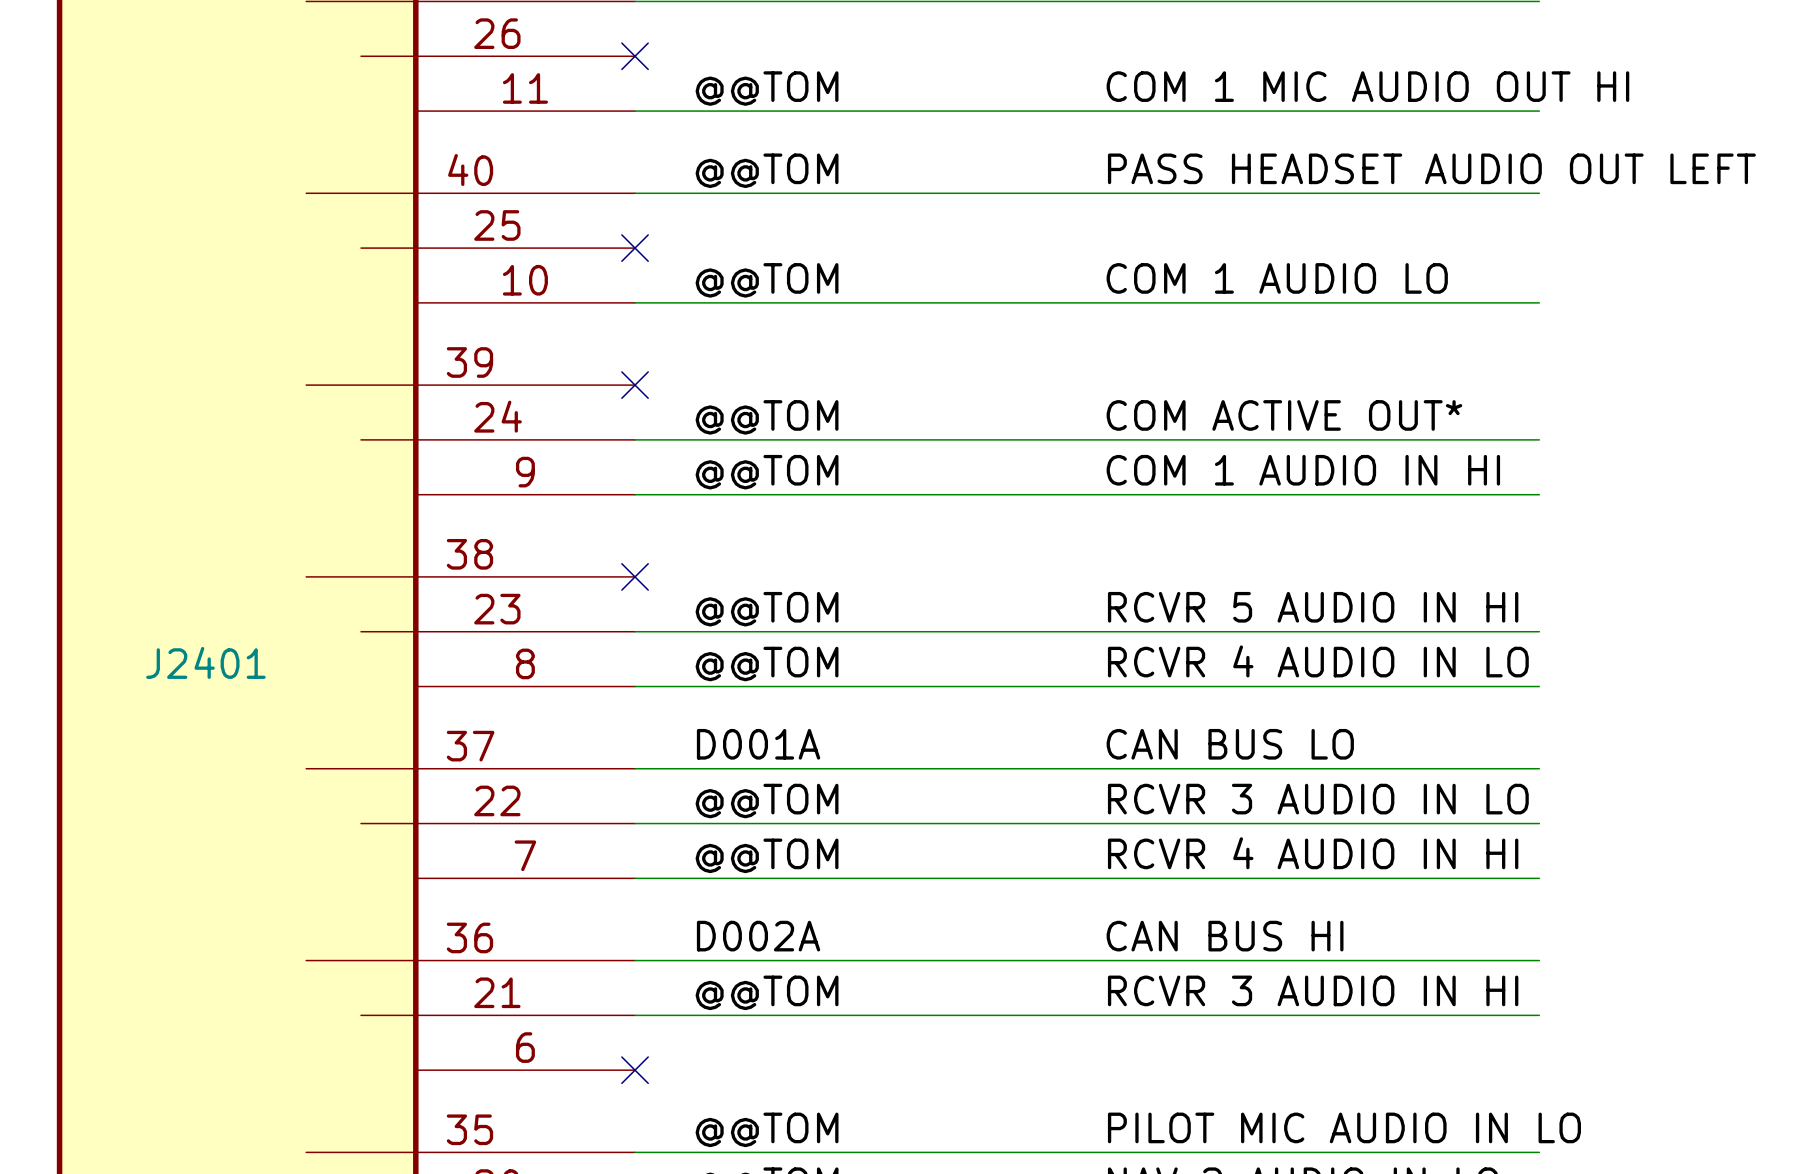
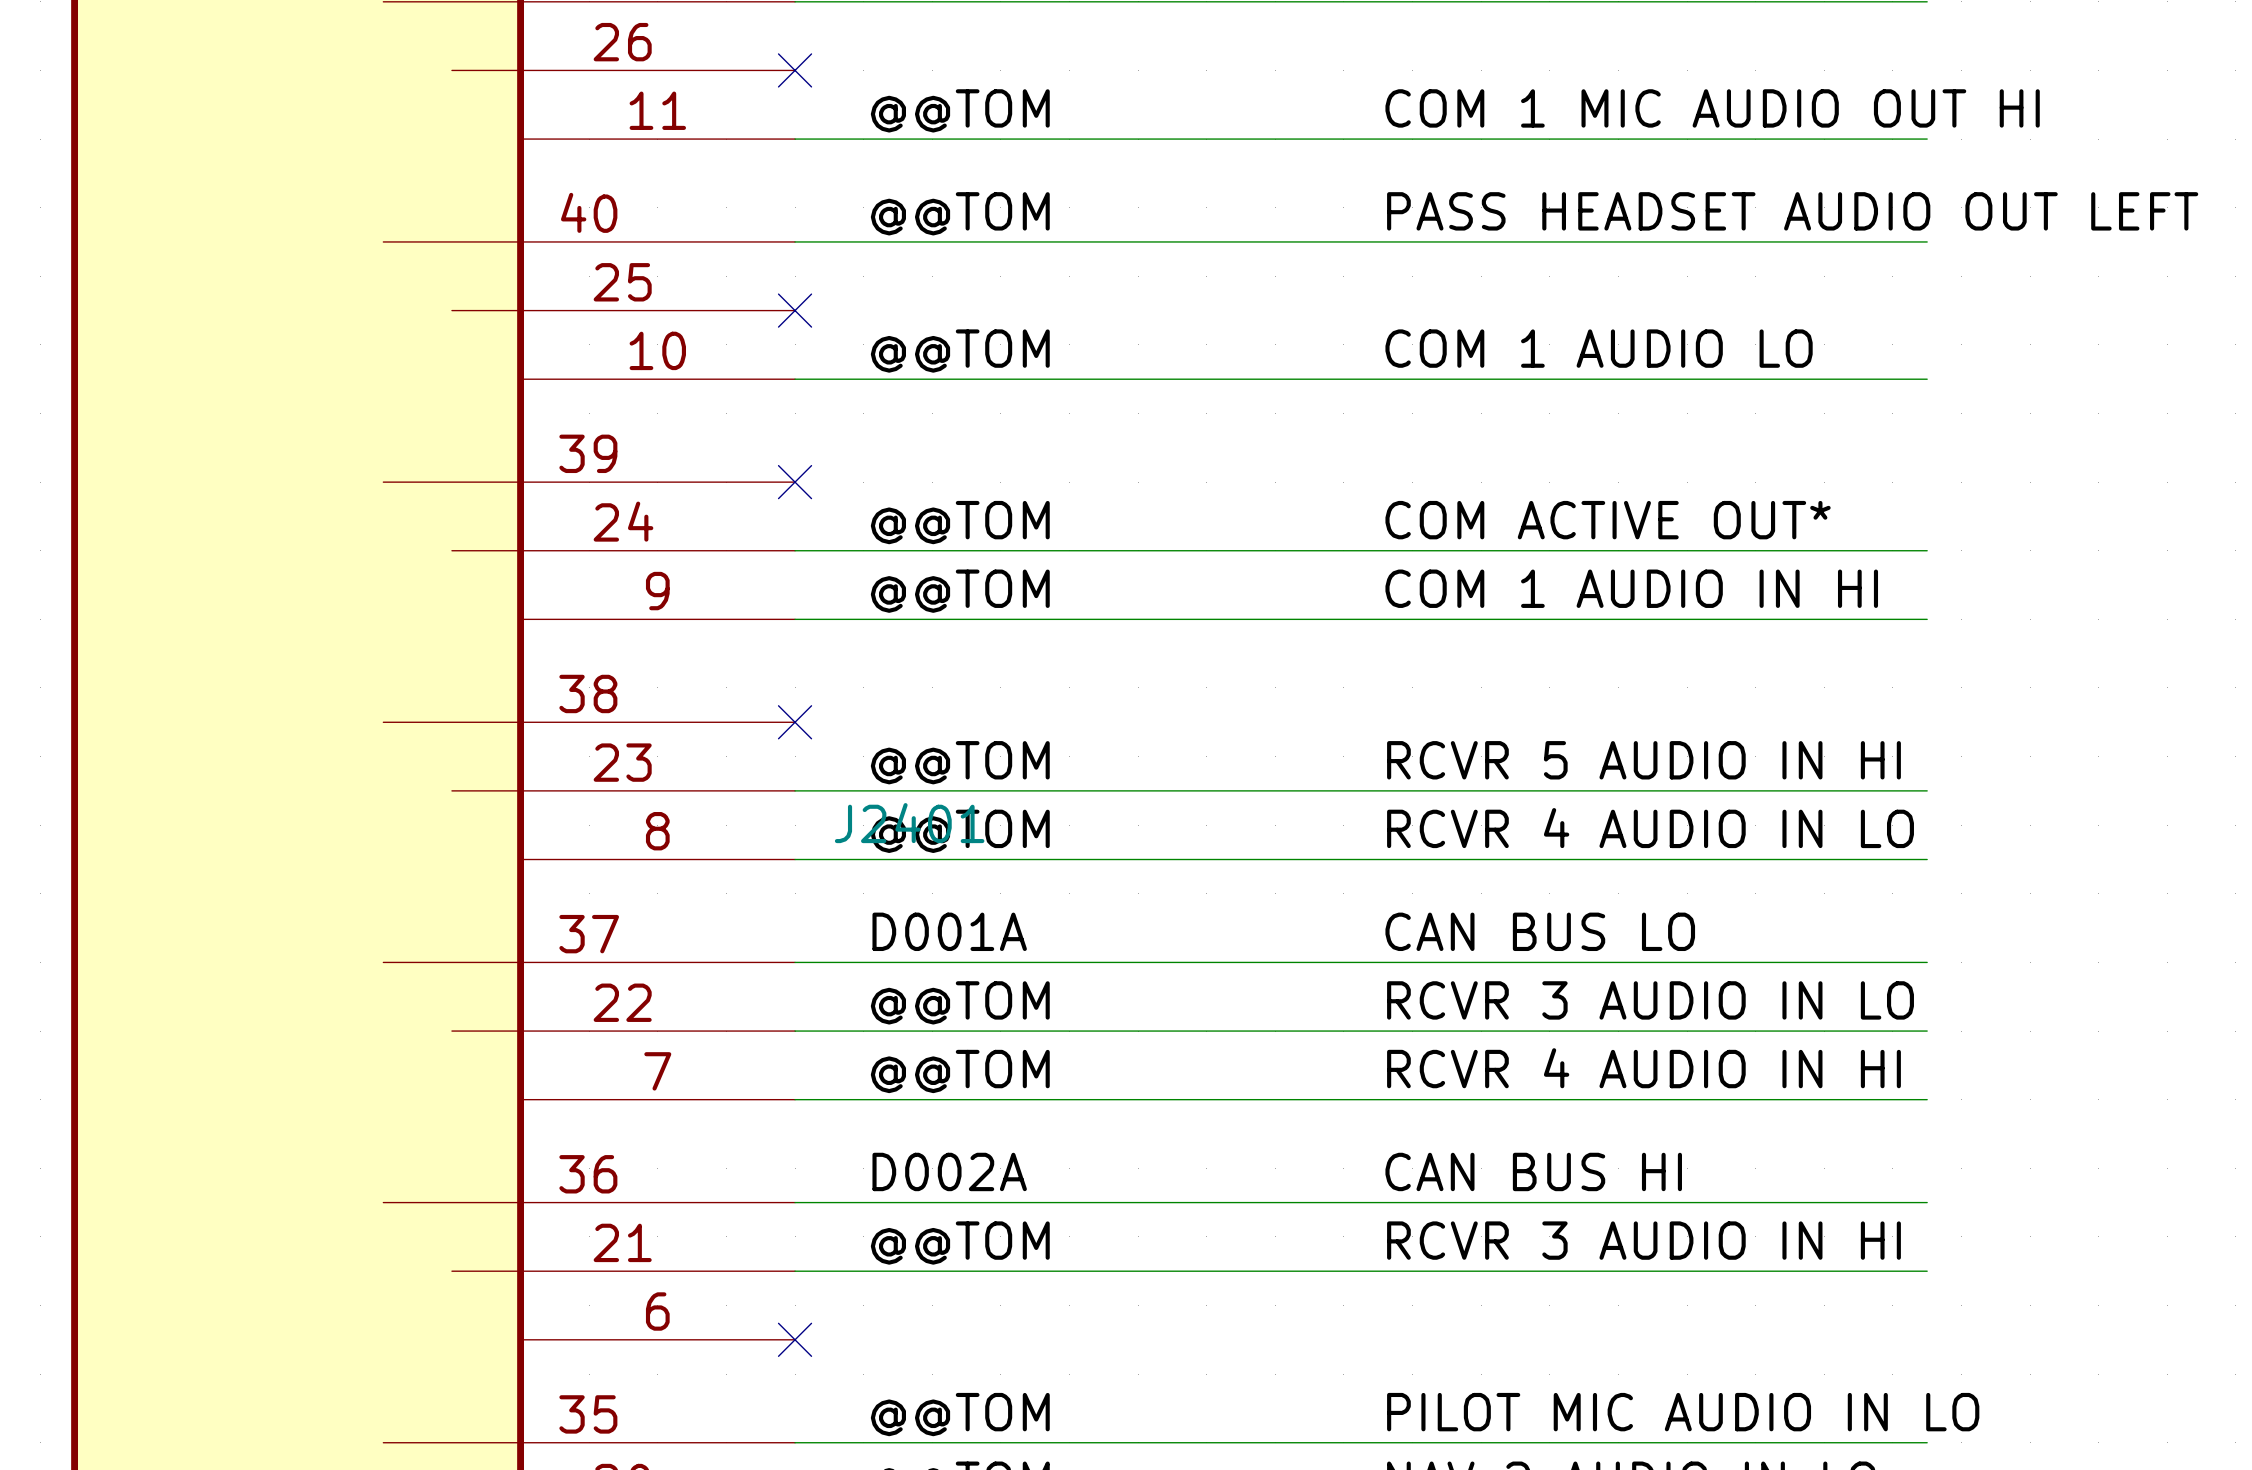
J2401 name position: J2401 (205, 662) -> J2401 (909, 823)

